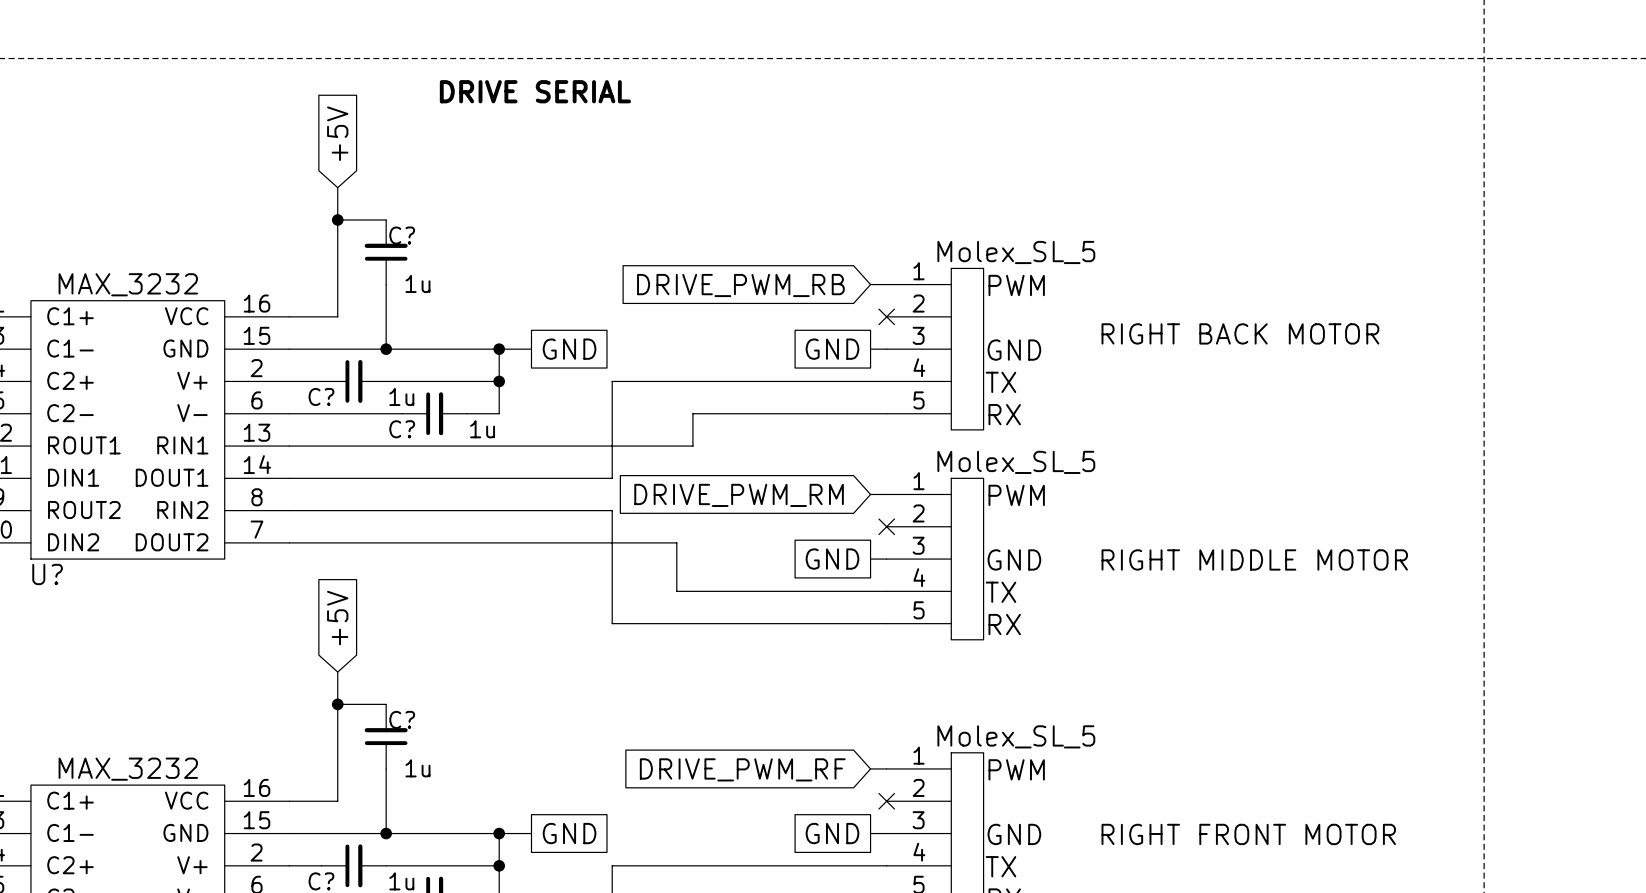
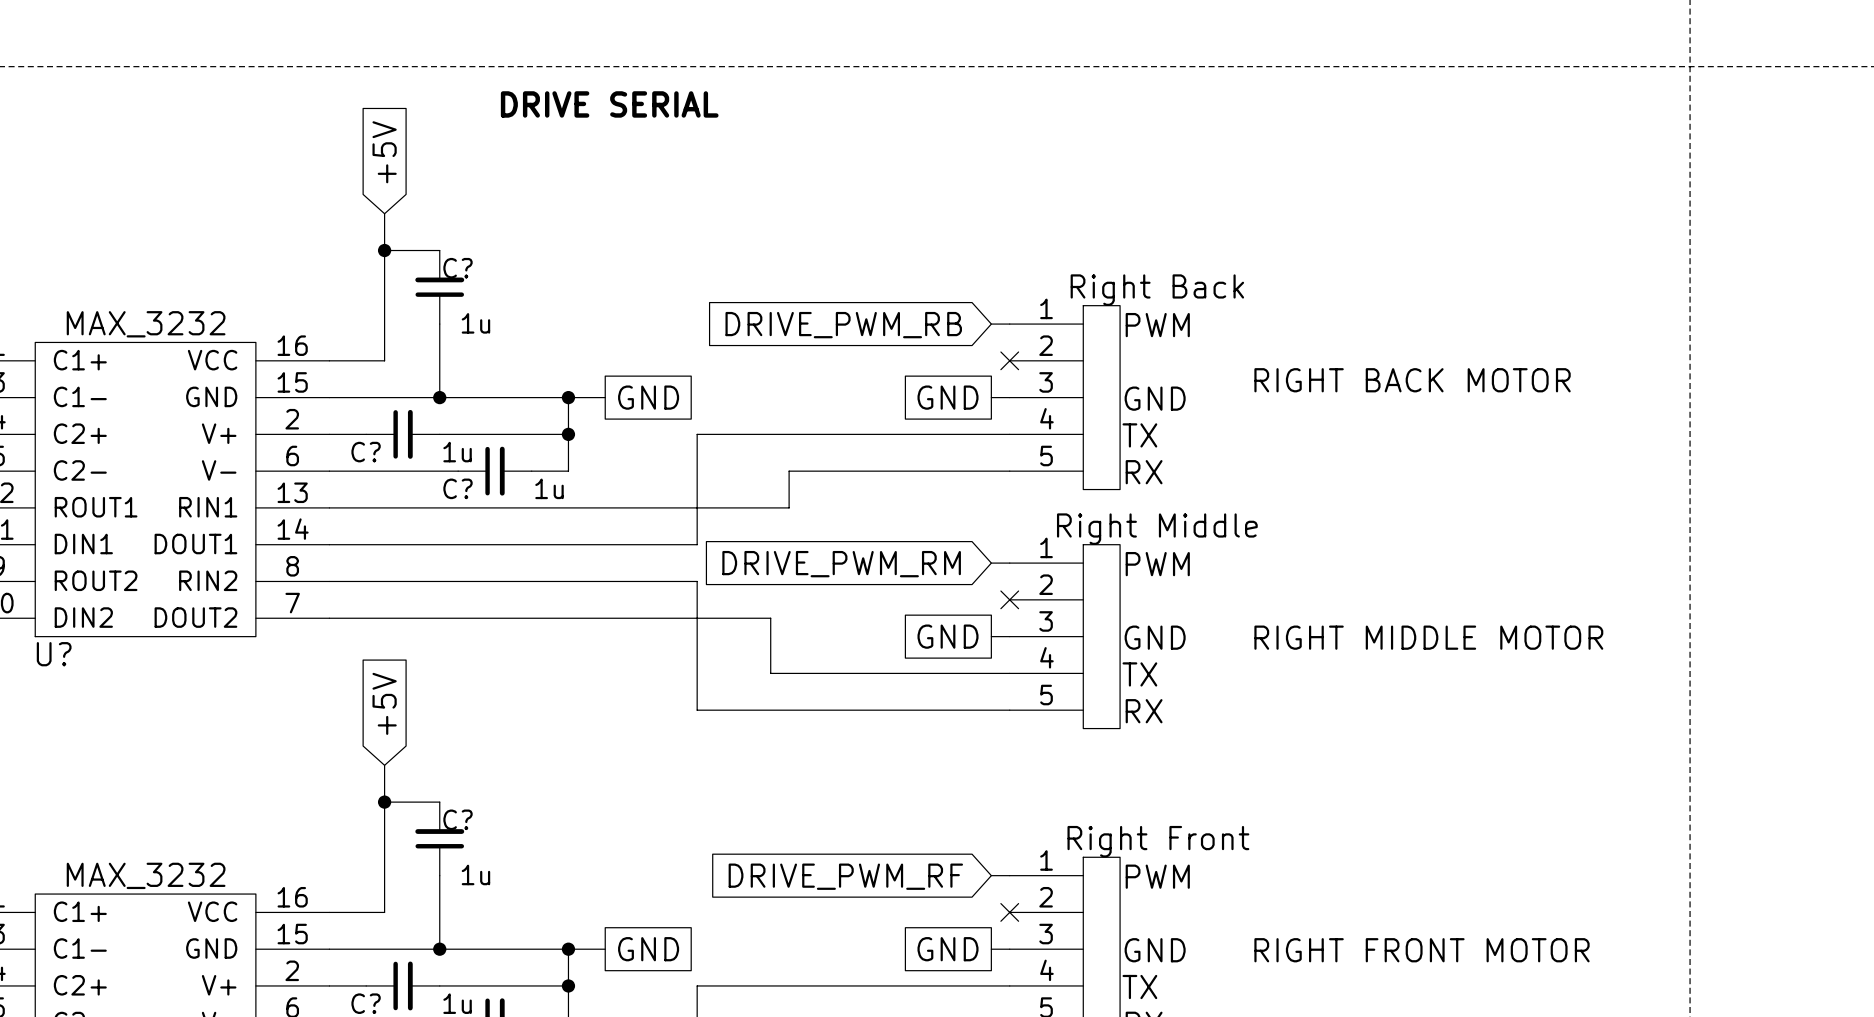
part value: Molex_SL_5 (1016, 252) -> Right Back (1157, 290)
part value: Molex_SL_5 (1016, 462) -> Right Middle (1157, 529)
part value: Molex_SL_5 (1016, 736) -> Right Front (1158, 841)

